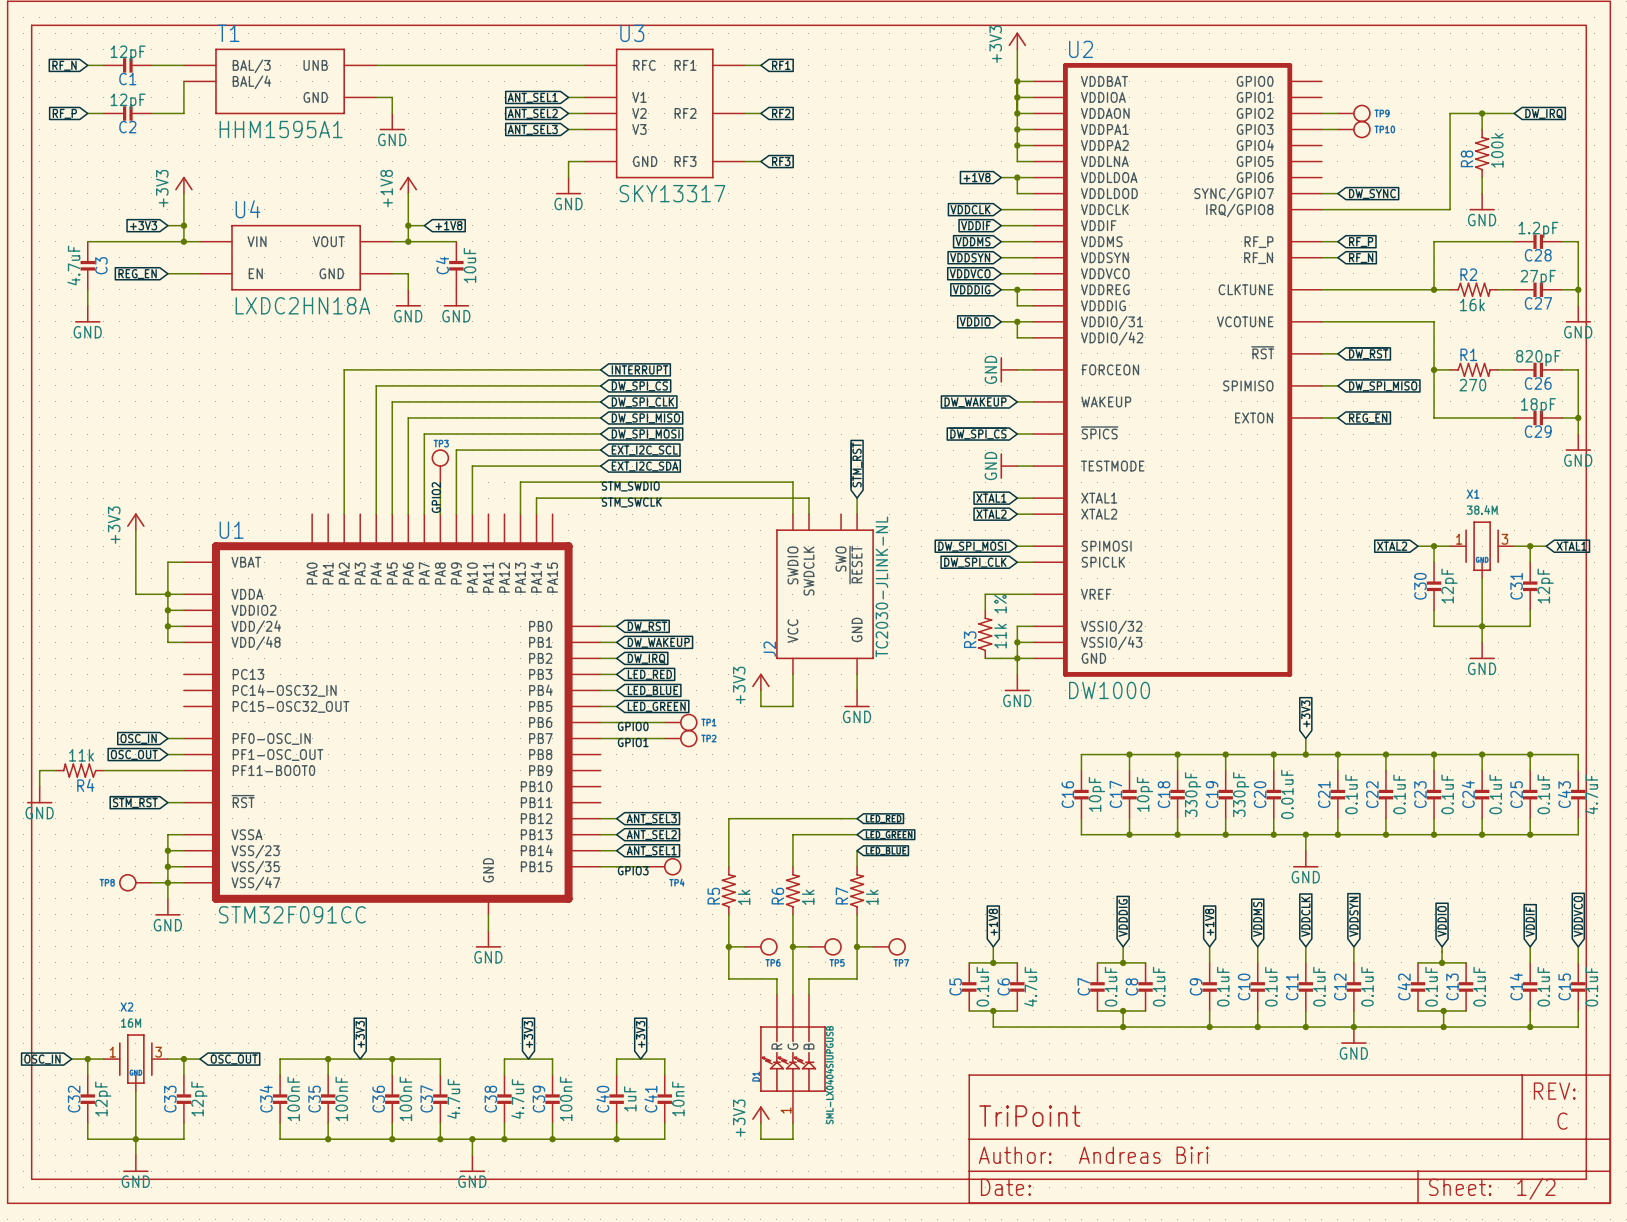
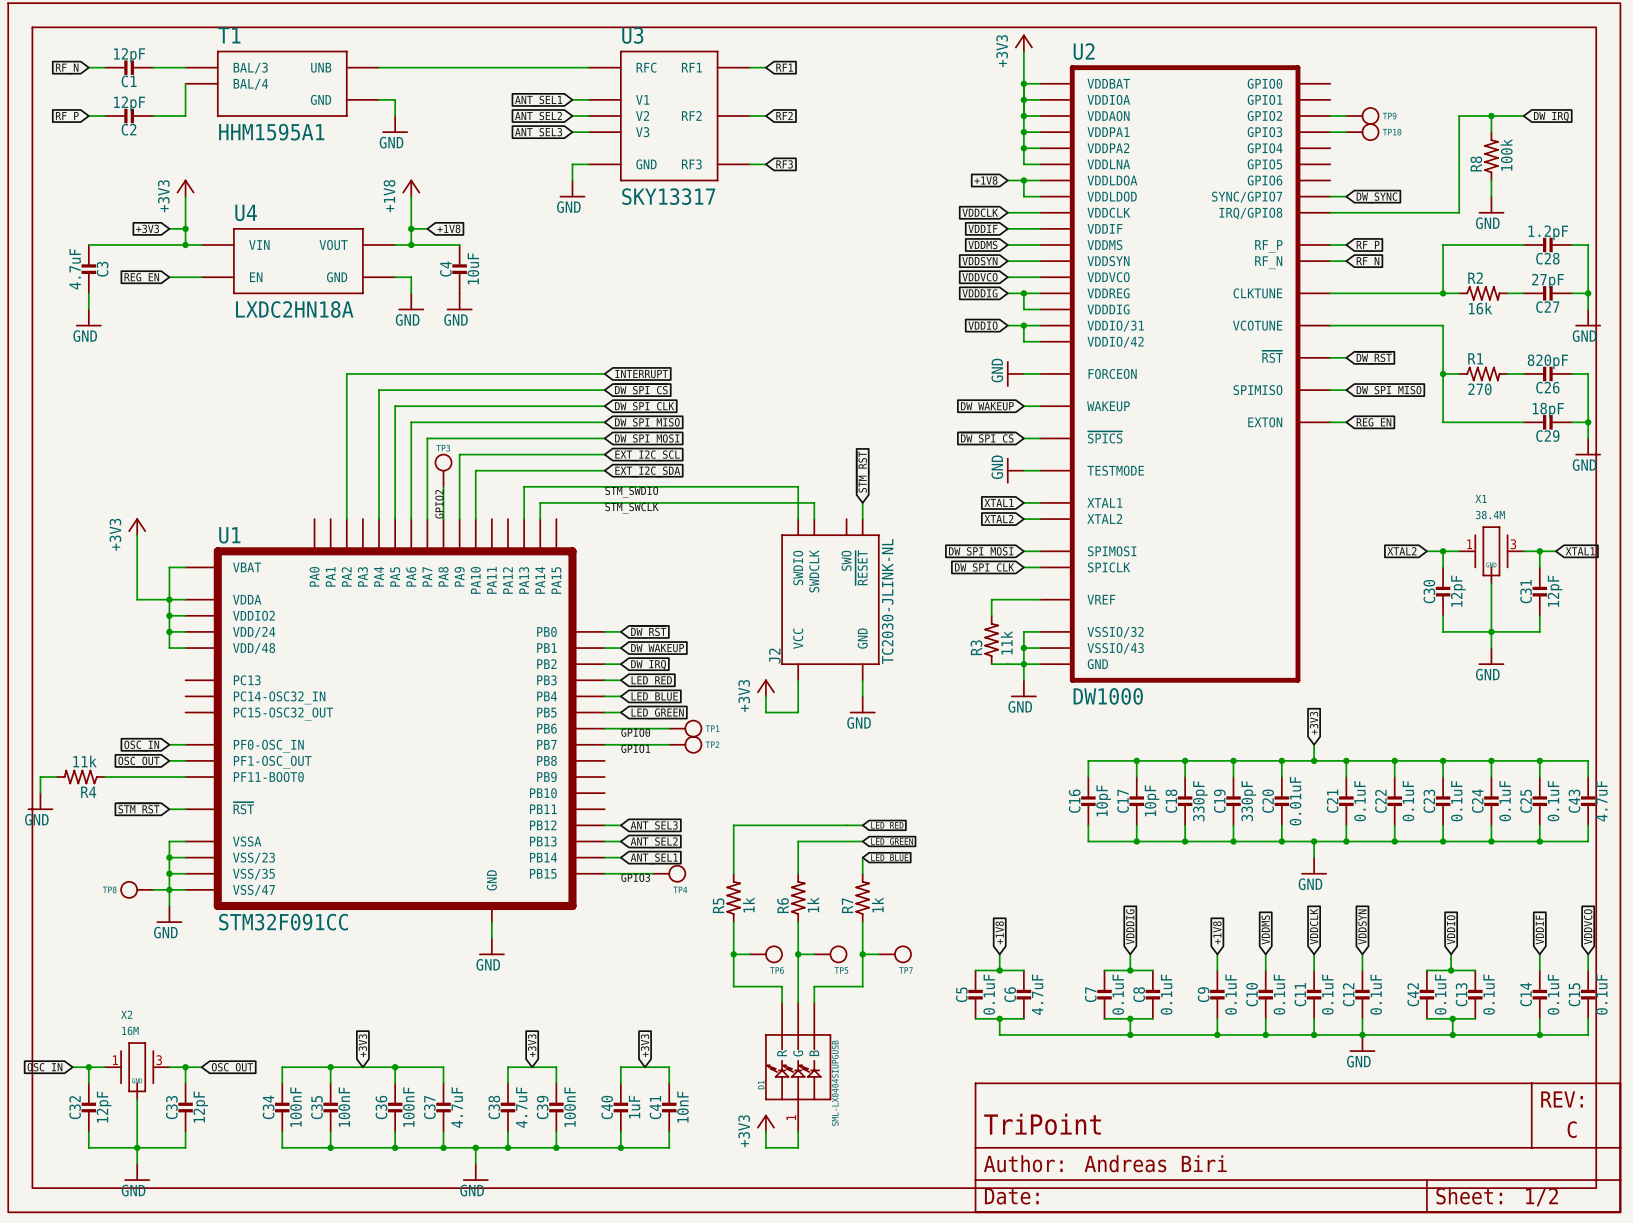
R3 value: 11k 1% (1000, 621) -> 11k (1006, 642)

